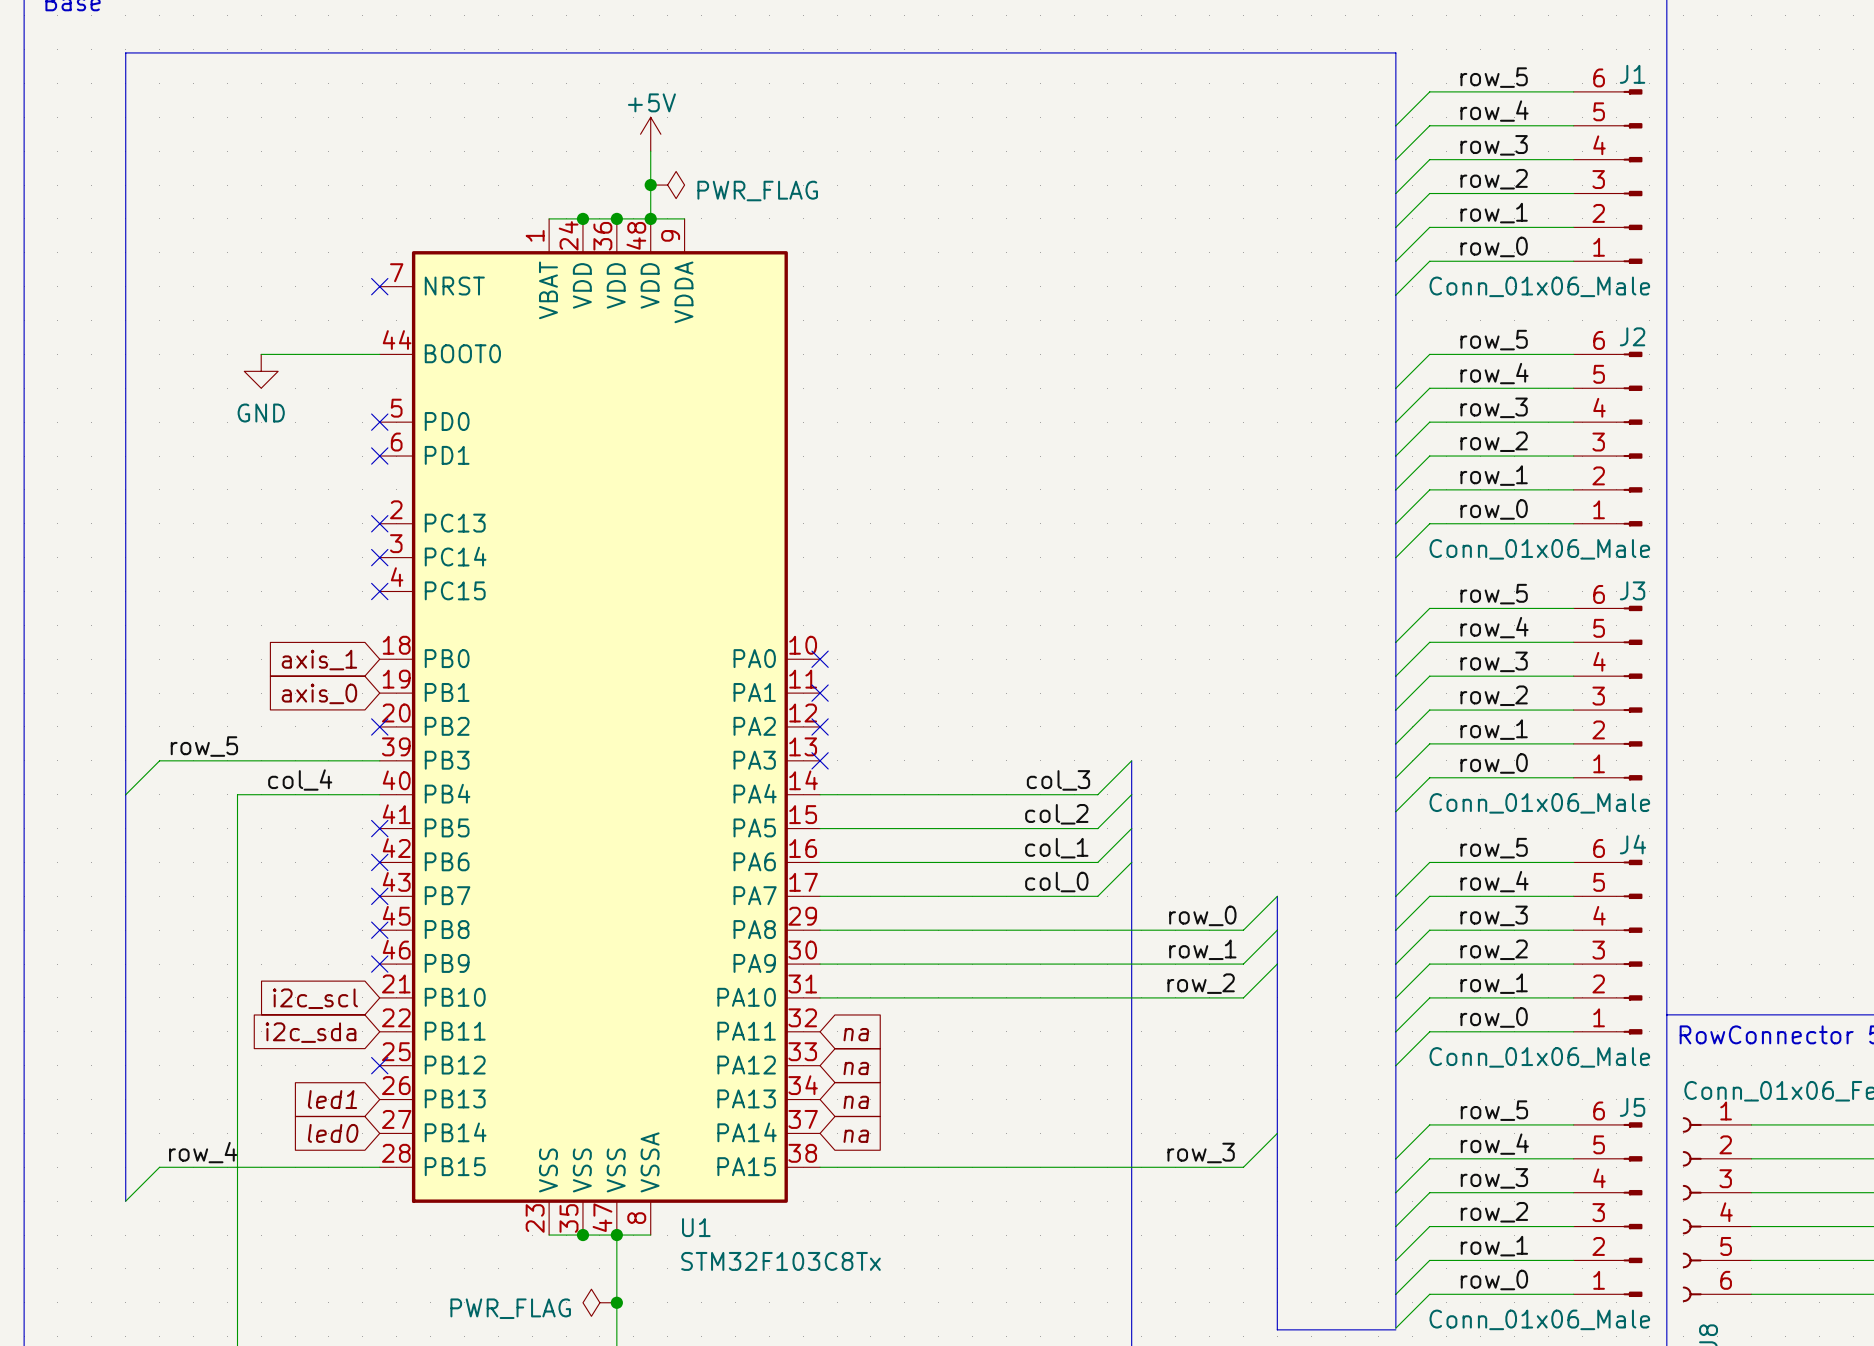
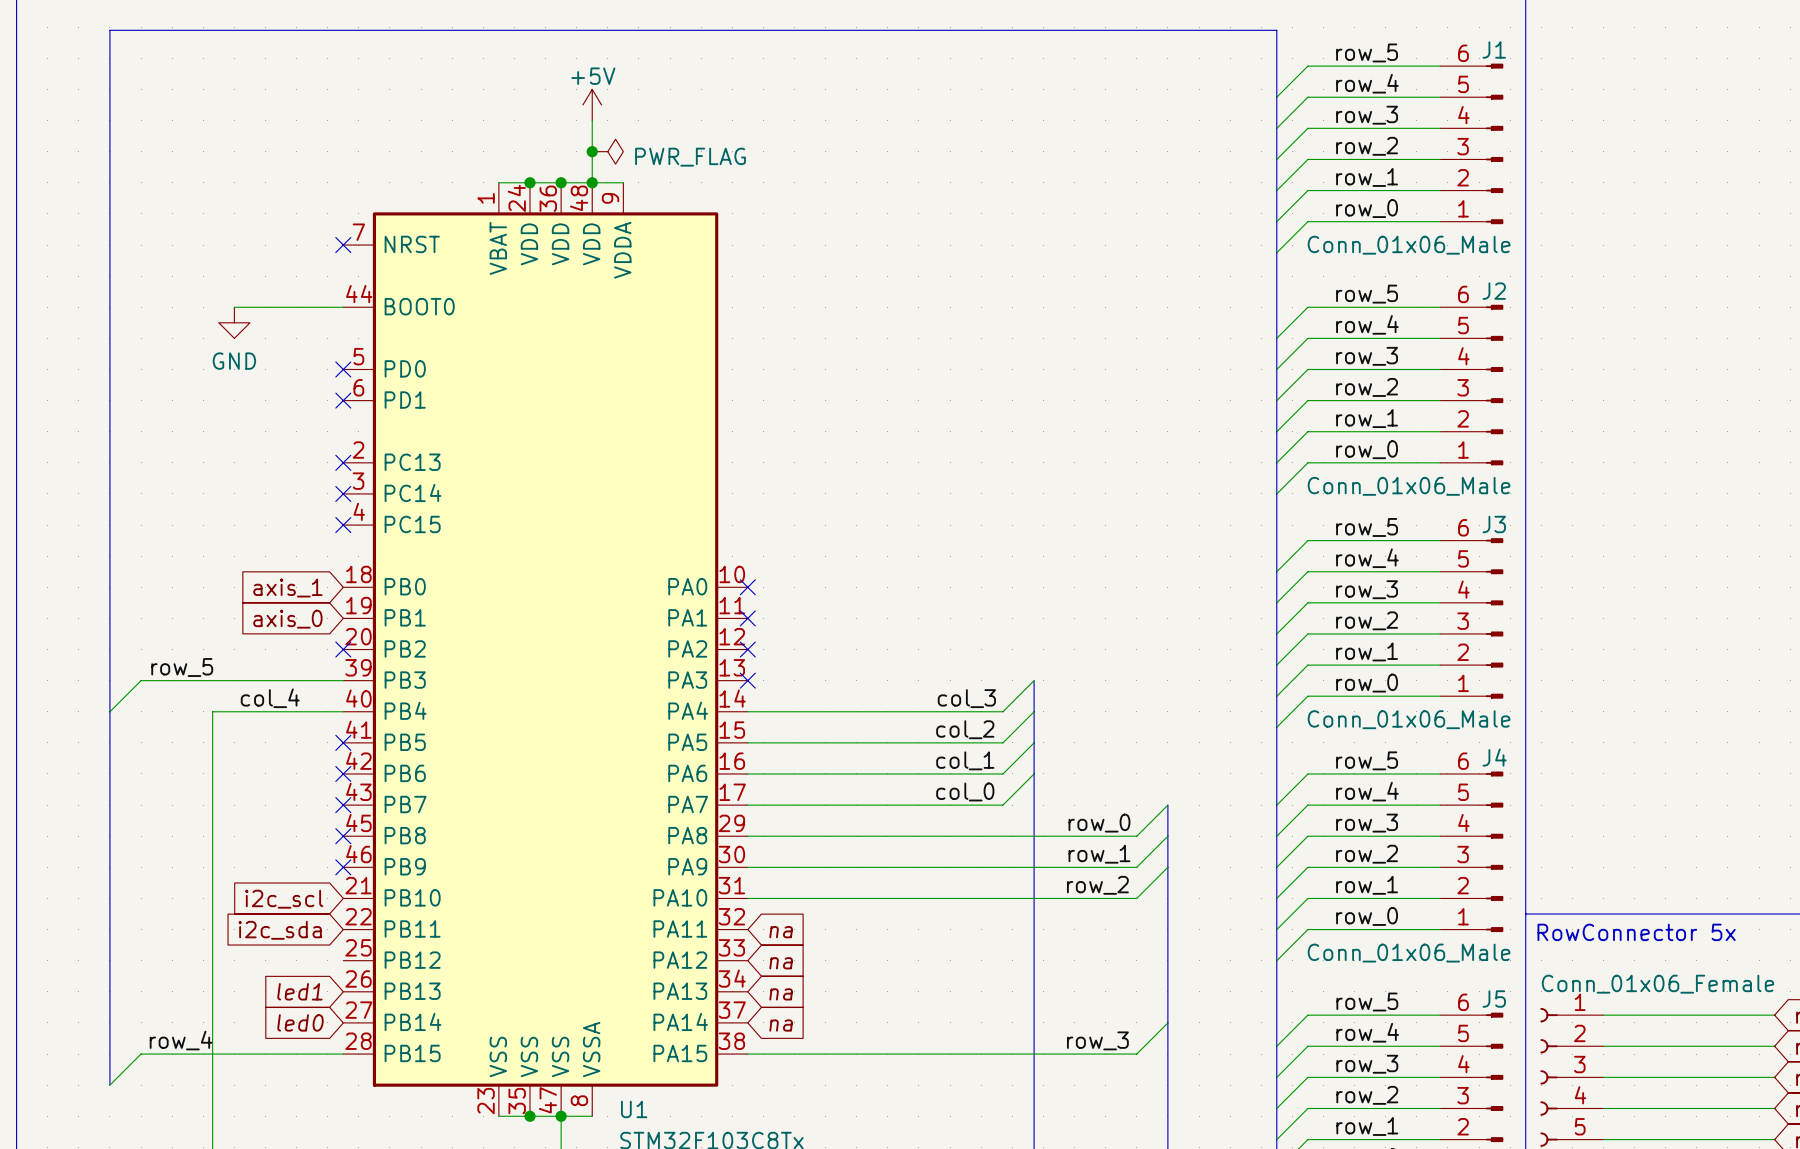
no-connect mark: (379, 1065) -> none

